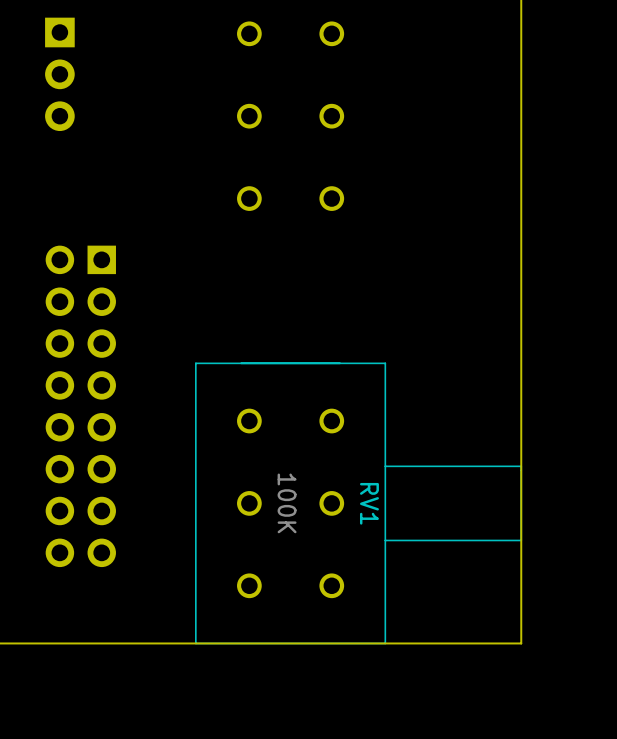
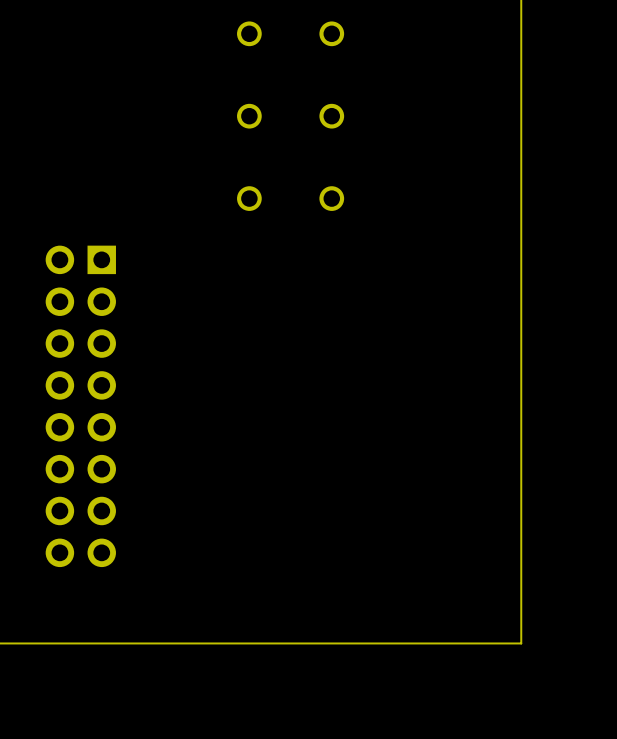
part: (59, 74) -> none
RV1: 100K (358, 503) -> none

